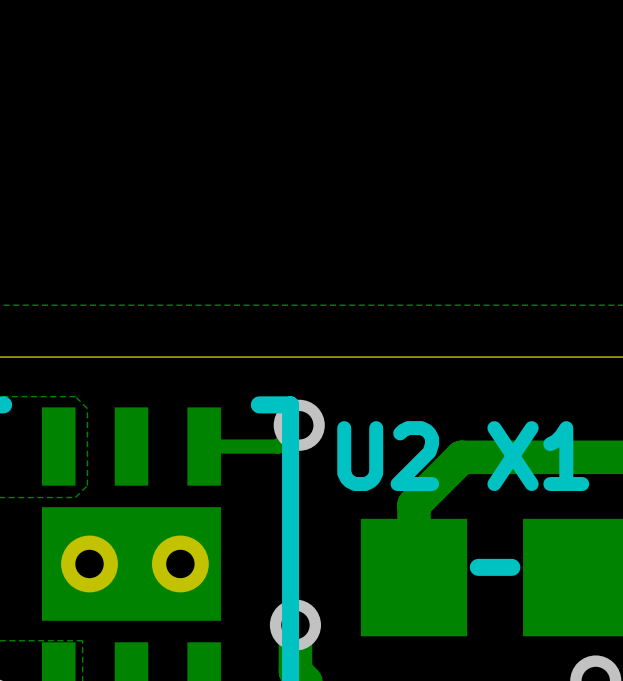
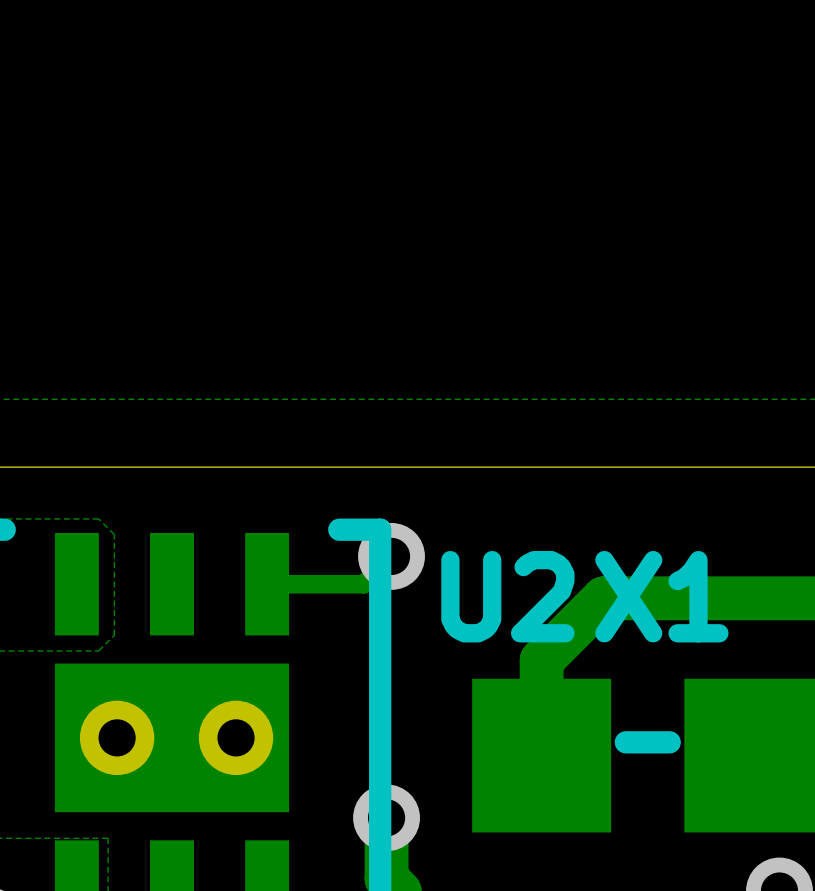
X1 name position: X1 (538, 456) -> X1 (661, 596)

